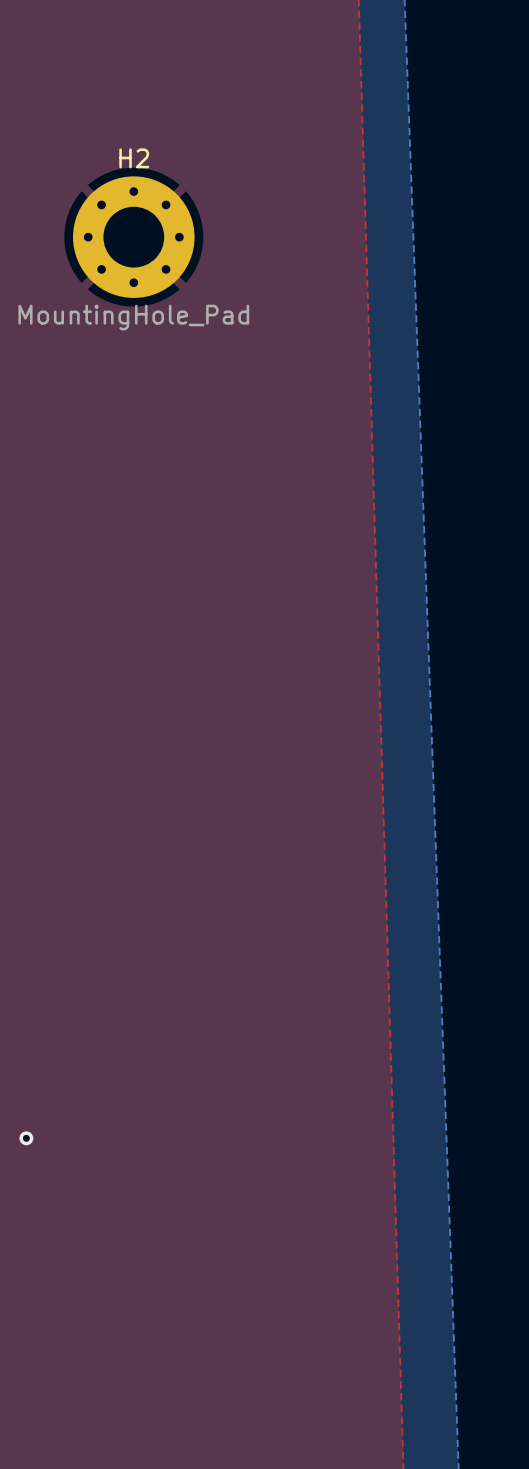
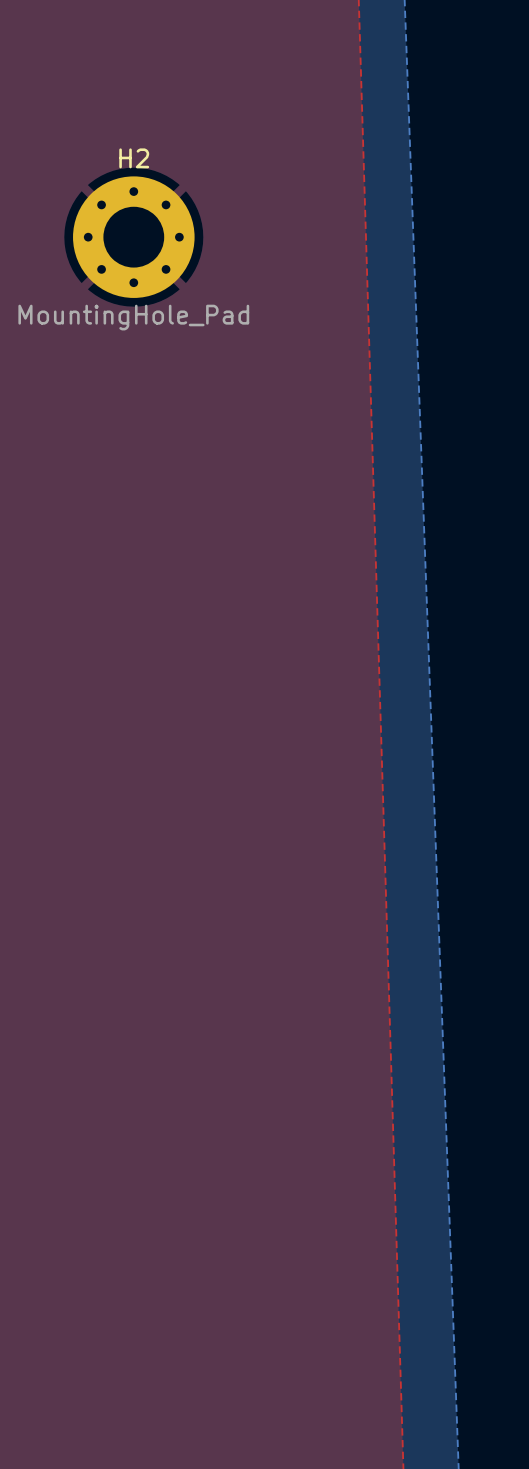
via: (26, 1138) -> none

